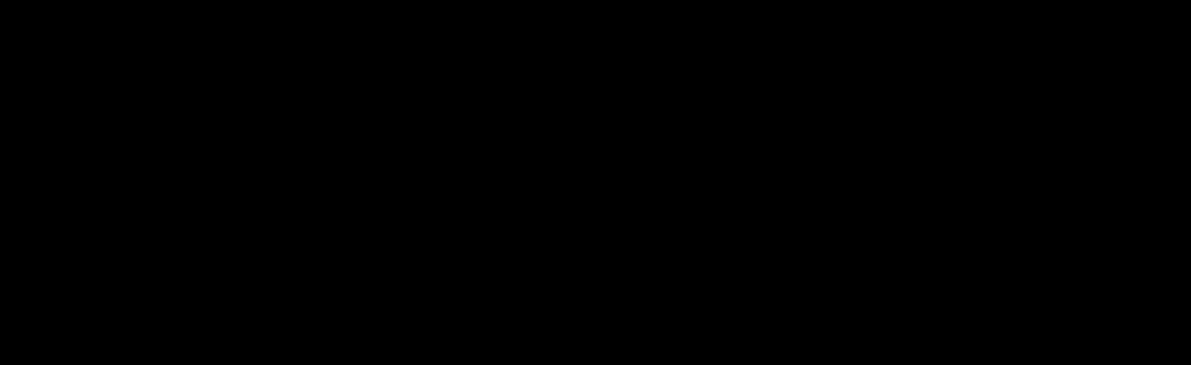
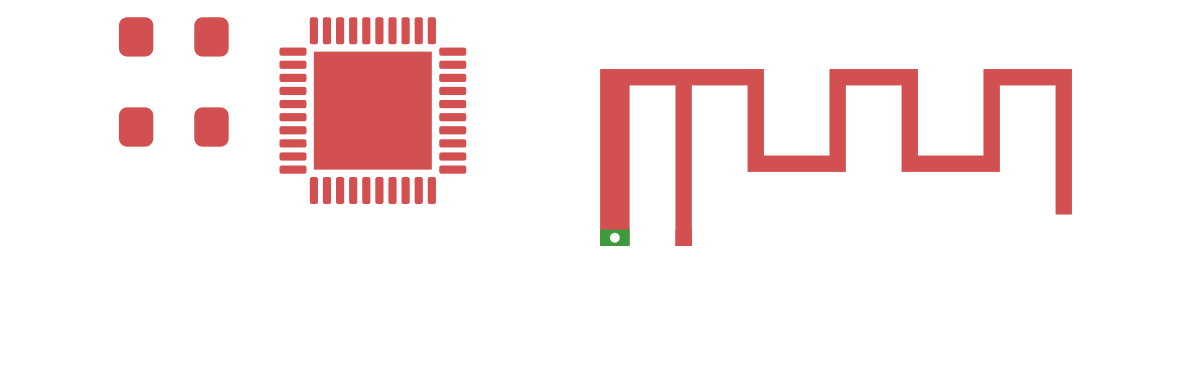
part: none -> (173, 36)
part: none -> (372, 110)
part: none -> (173, 127)
part: none -> (836, 157)

